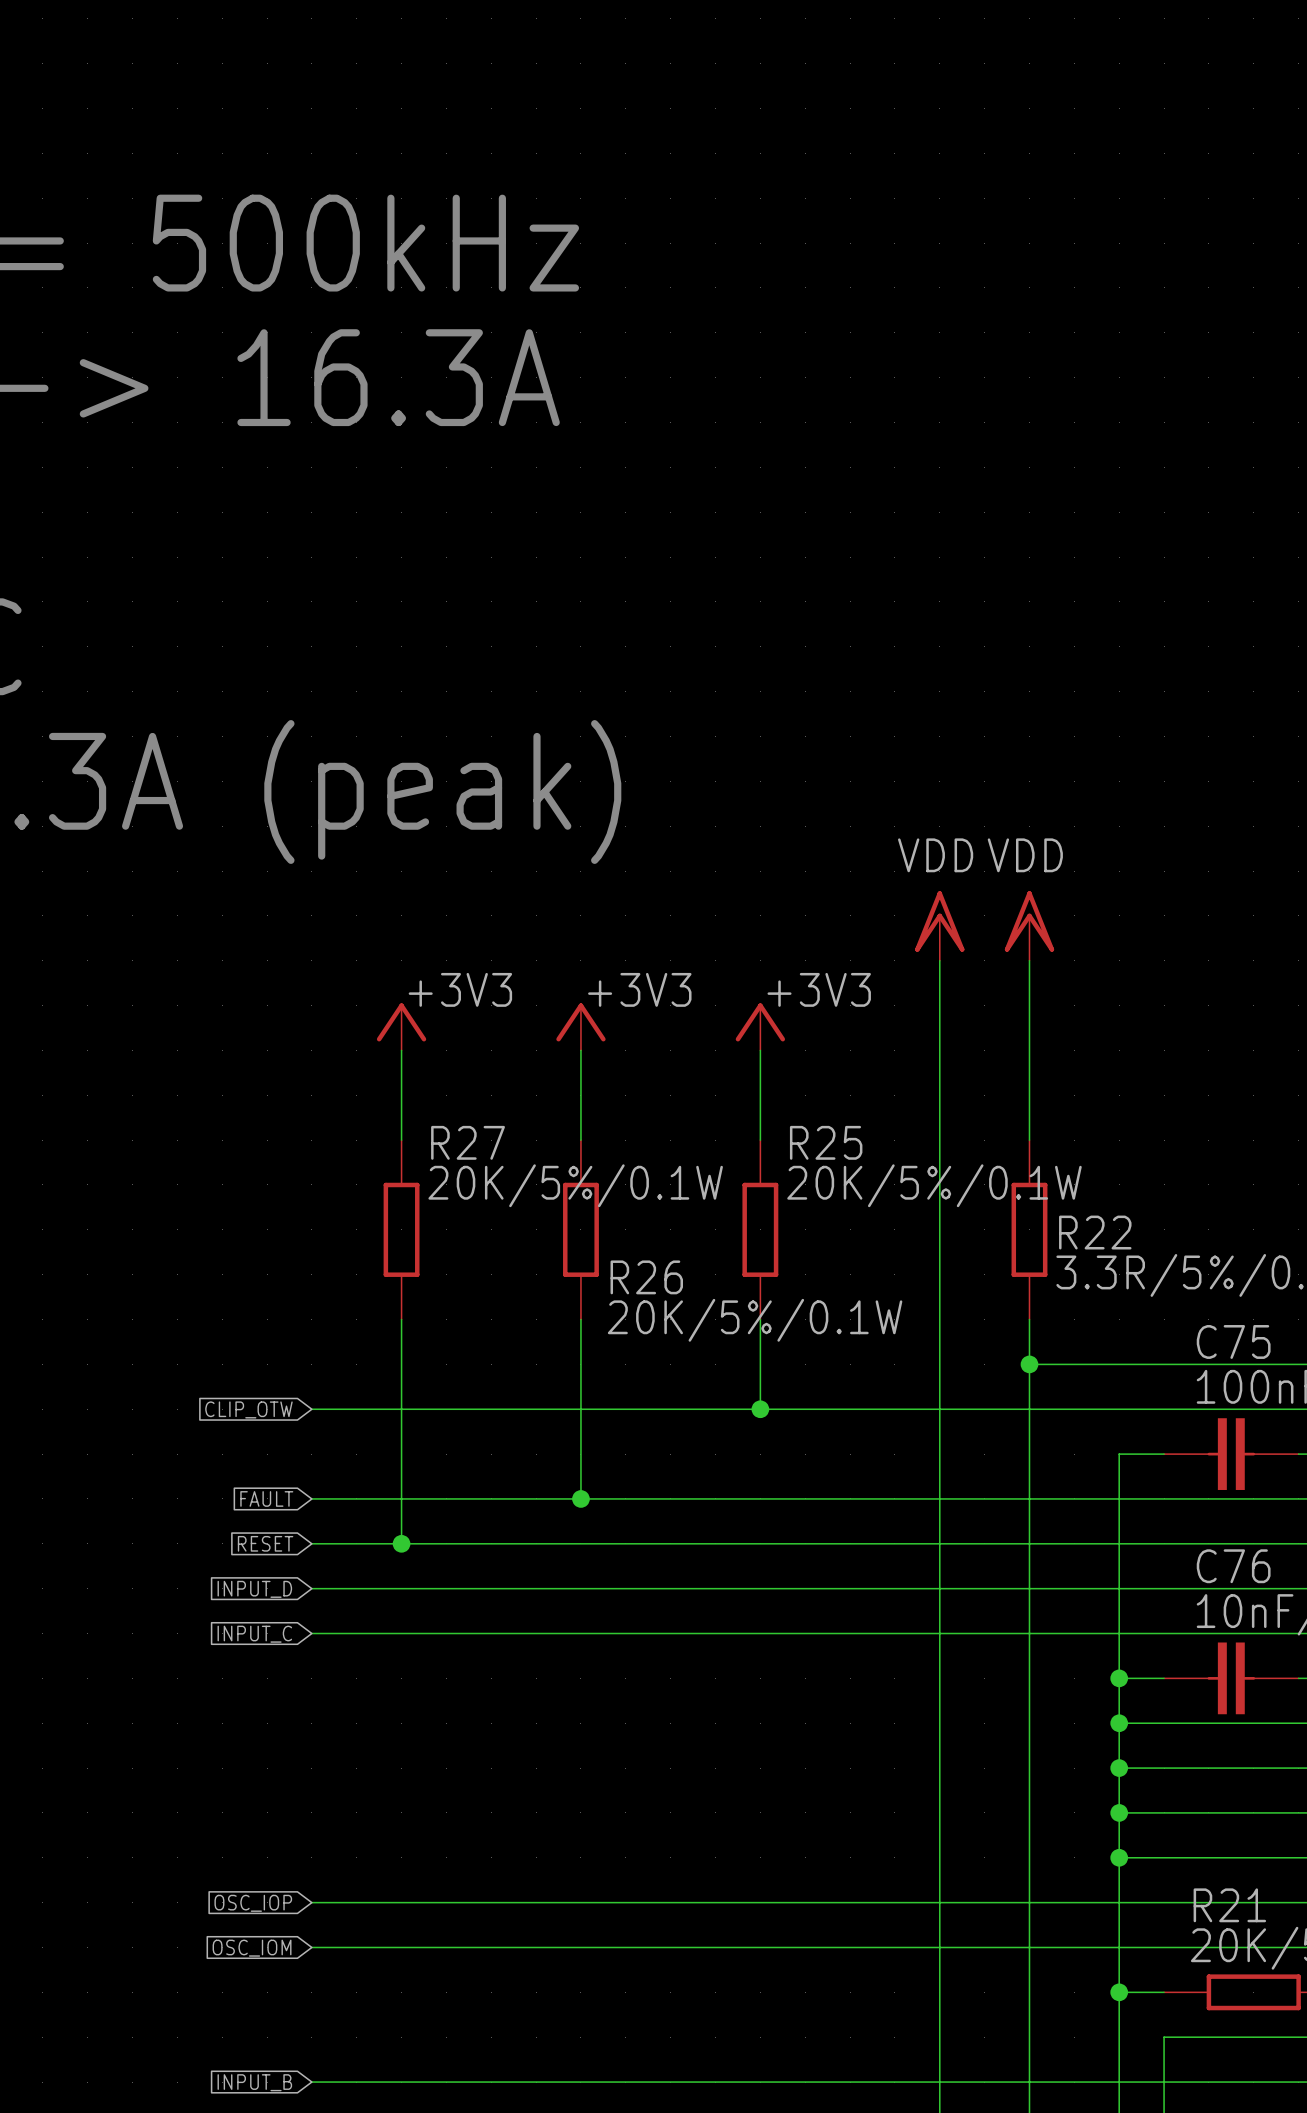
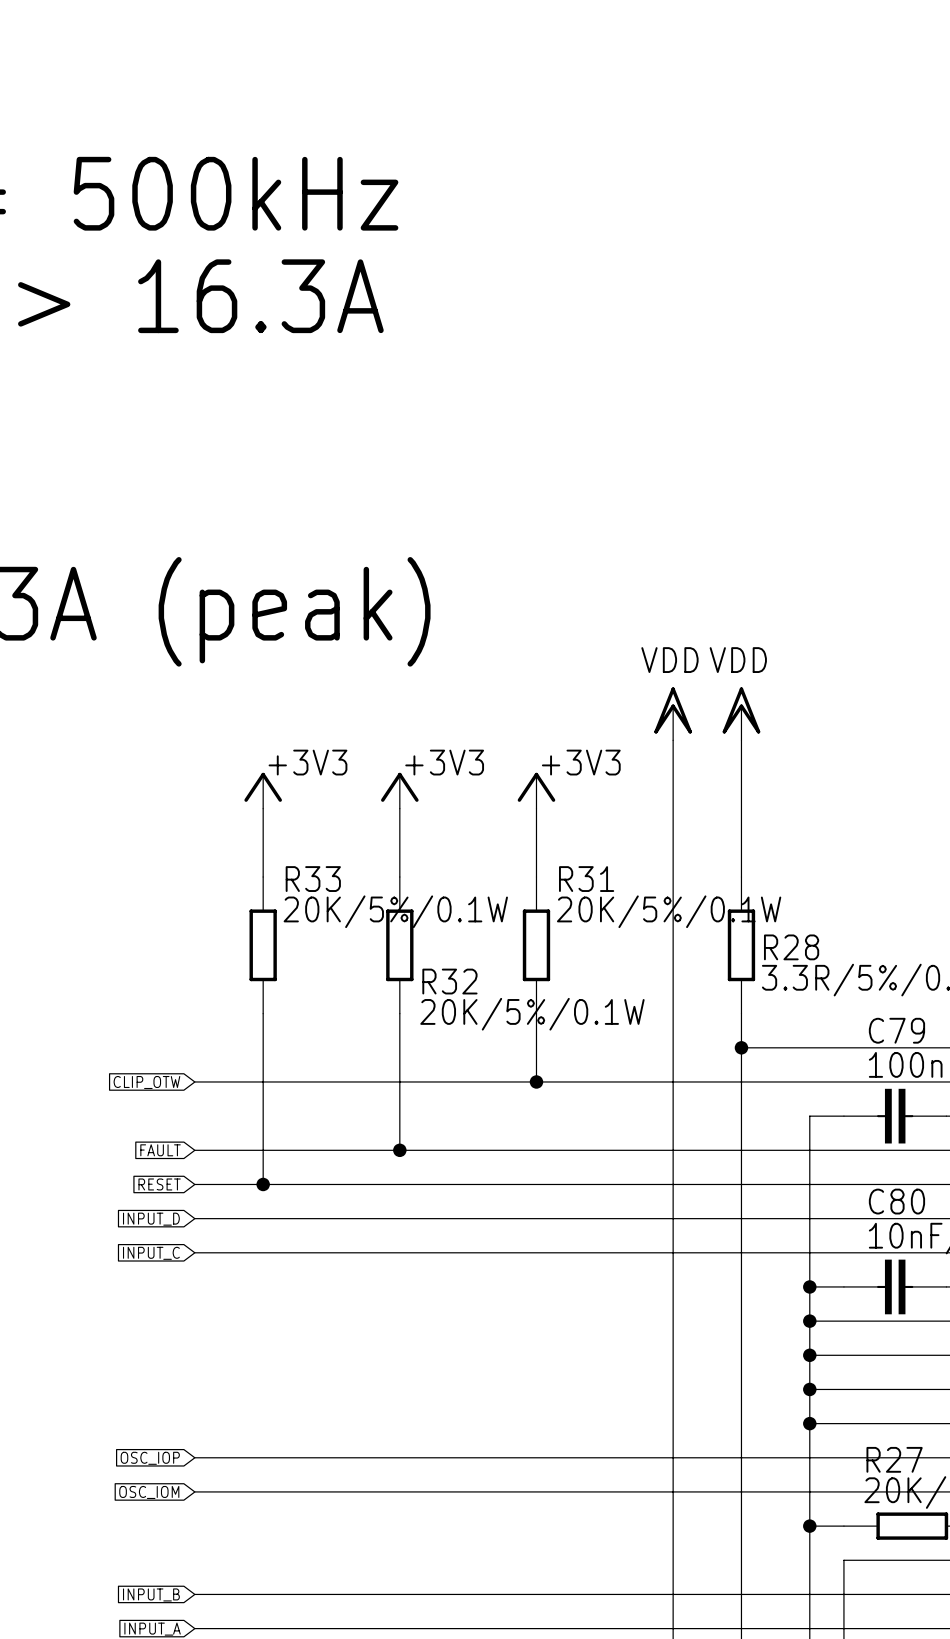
R27 name: R27 (468, 1142) -> R33 (313, 879)
R25 name: R25 (826, 1142) -> R31 (586, 879)
R22 name: R22 (1095, 1232) -> R28 (791, 947)
R26 name: R26 (646, 1277) -> R32 (449, 981)
C75 name: C75 (1233, 1341) -> C79 (896, 1030)
C76 name: C76 (1233, 1566) -> C80 (896, 1201)
R21 name: R21 (1229, 1905) -> R27 (894, 1459)

